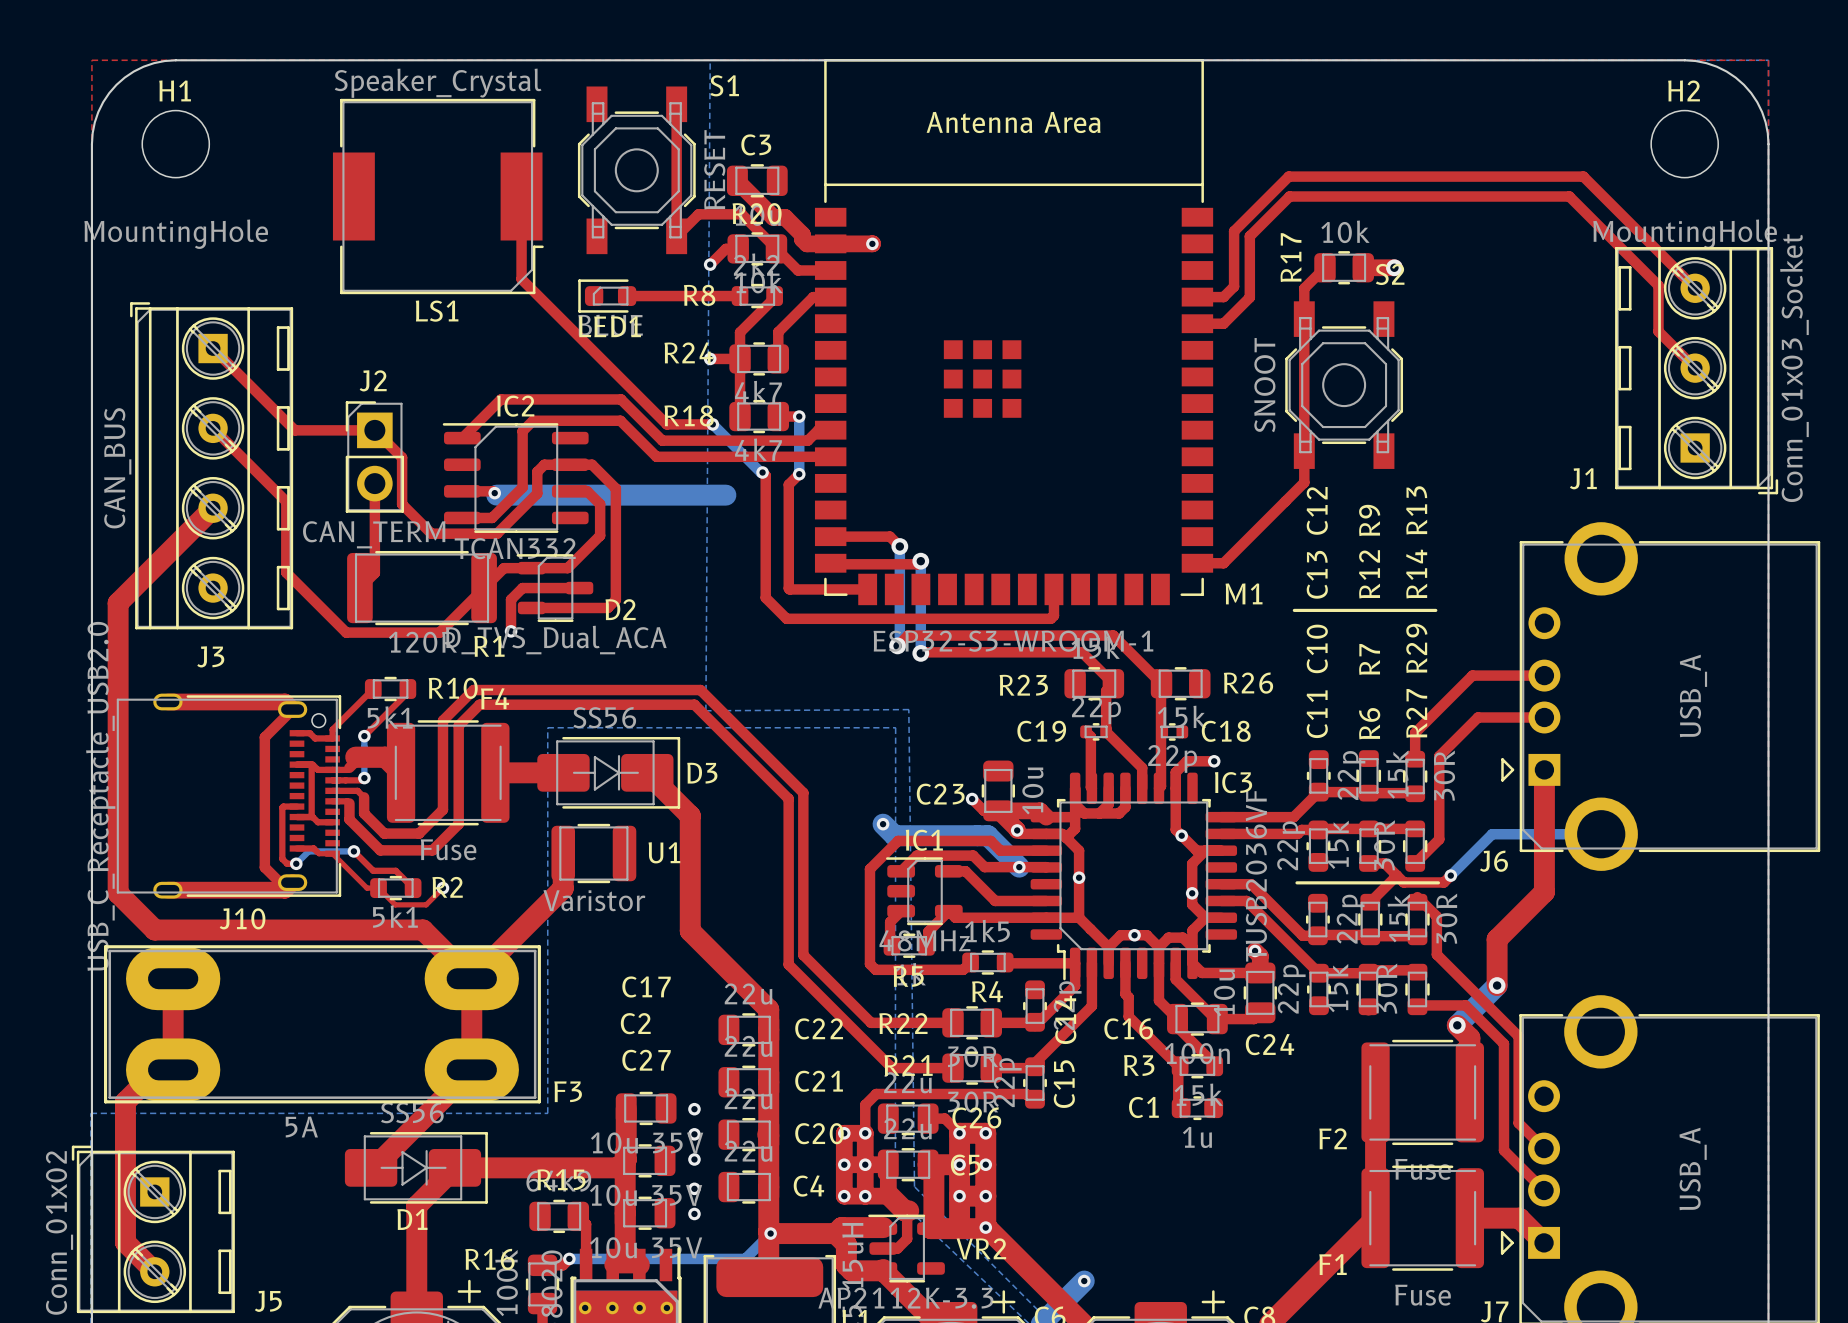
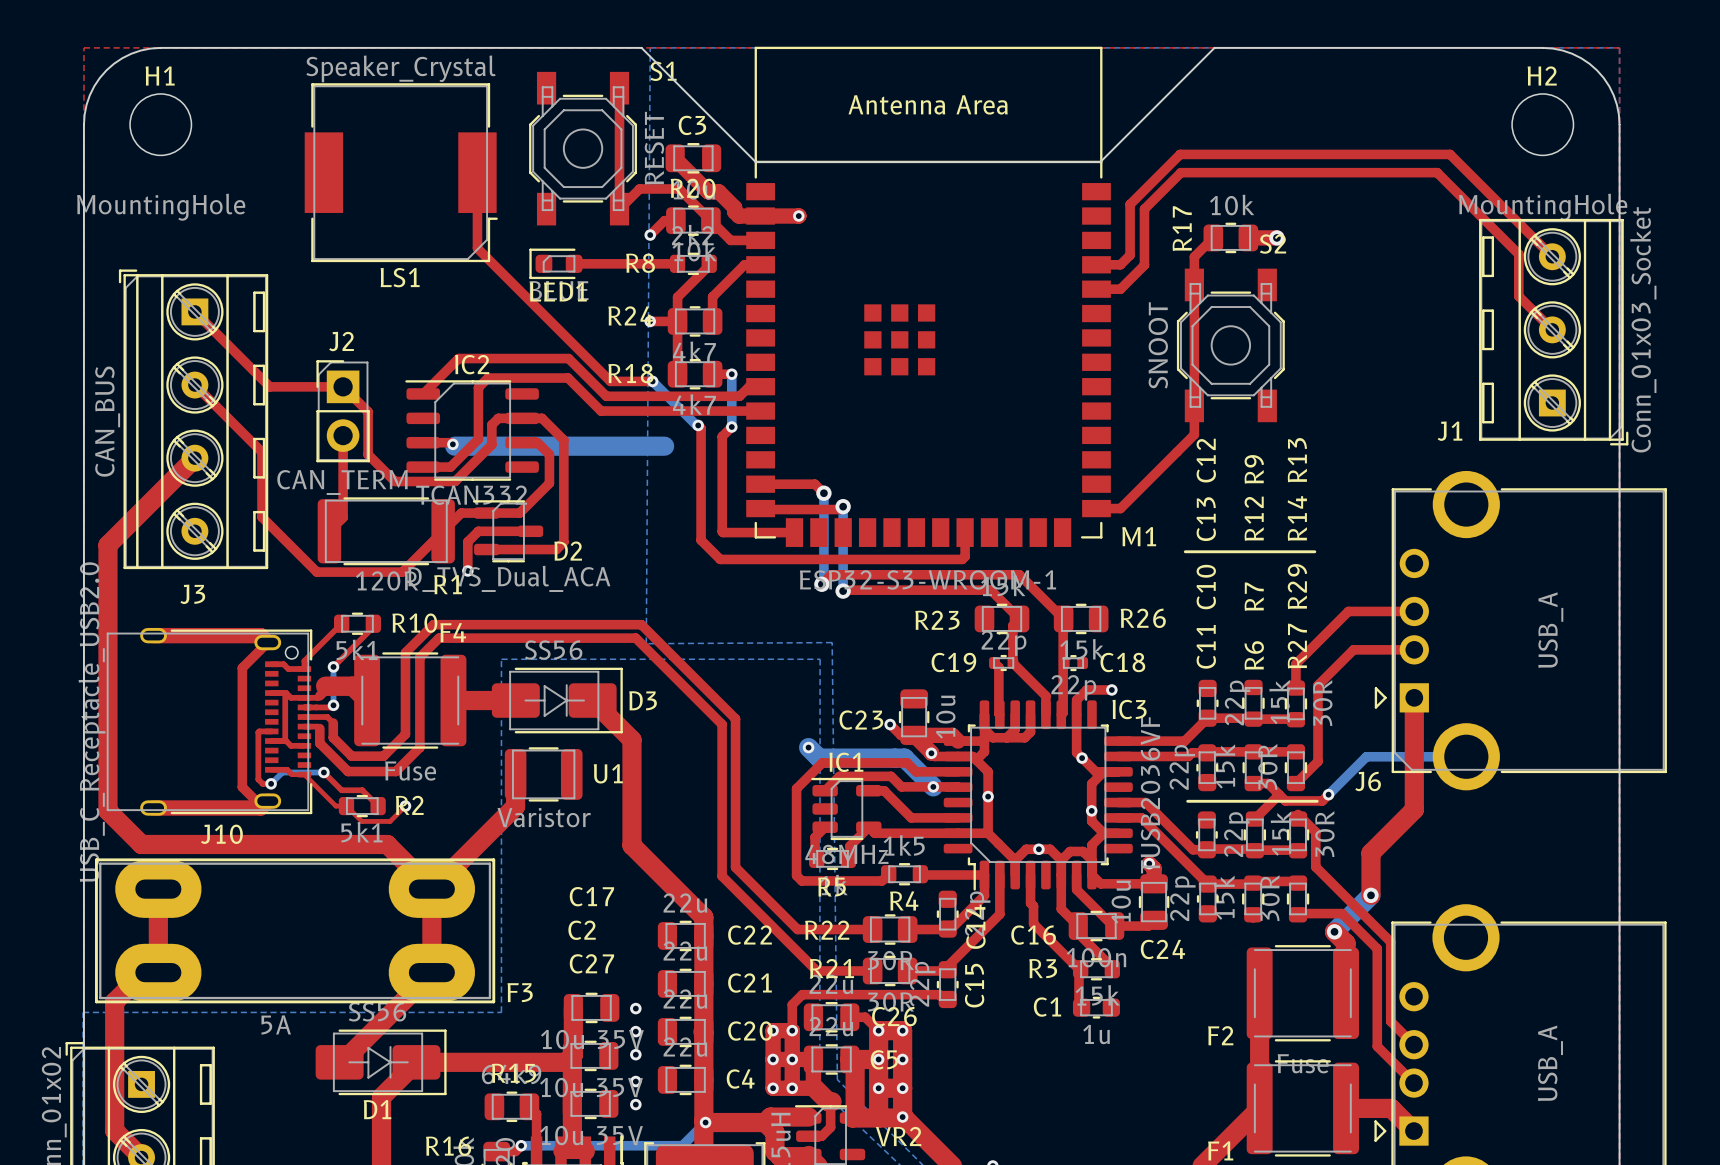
board edge: (700, 60) (1326, 60) -> (641, 47) (755, 162) (1100, 162) (1214, 47)

